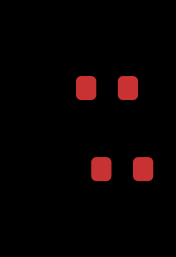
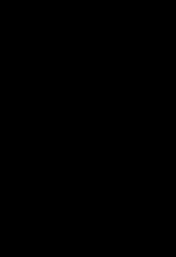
part: (107, 88) -> none
part: (122, 169) -> none

